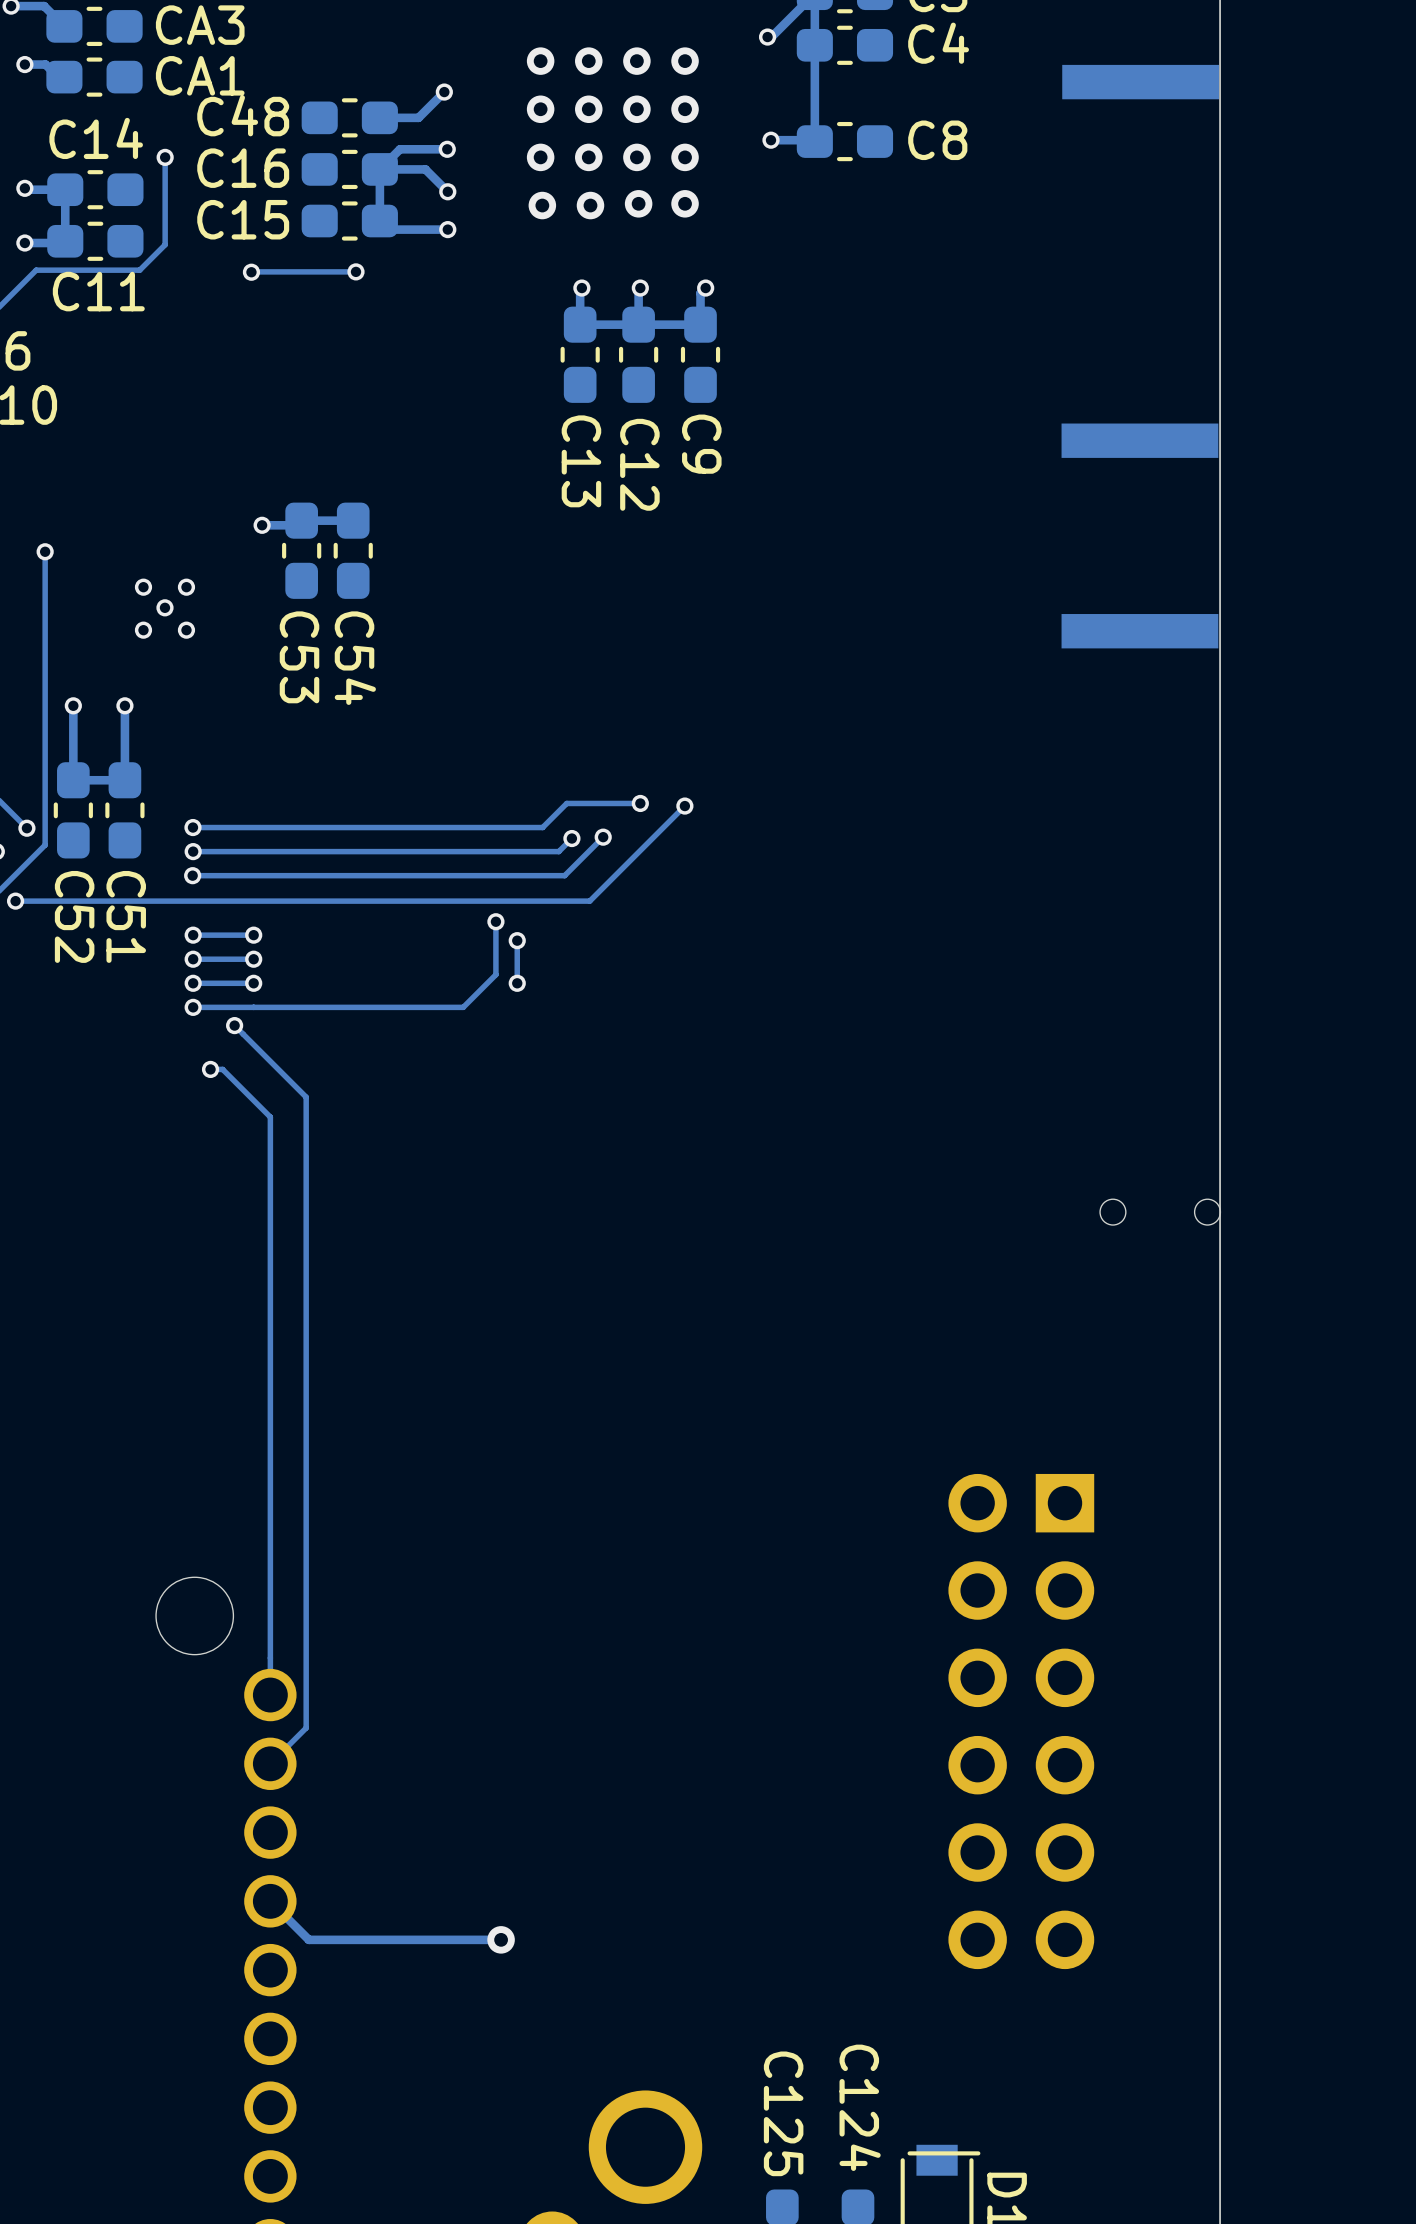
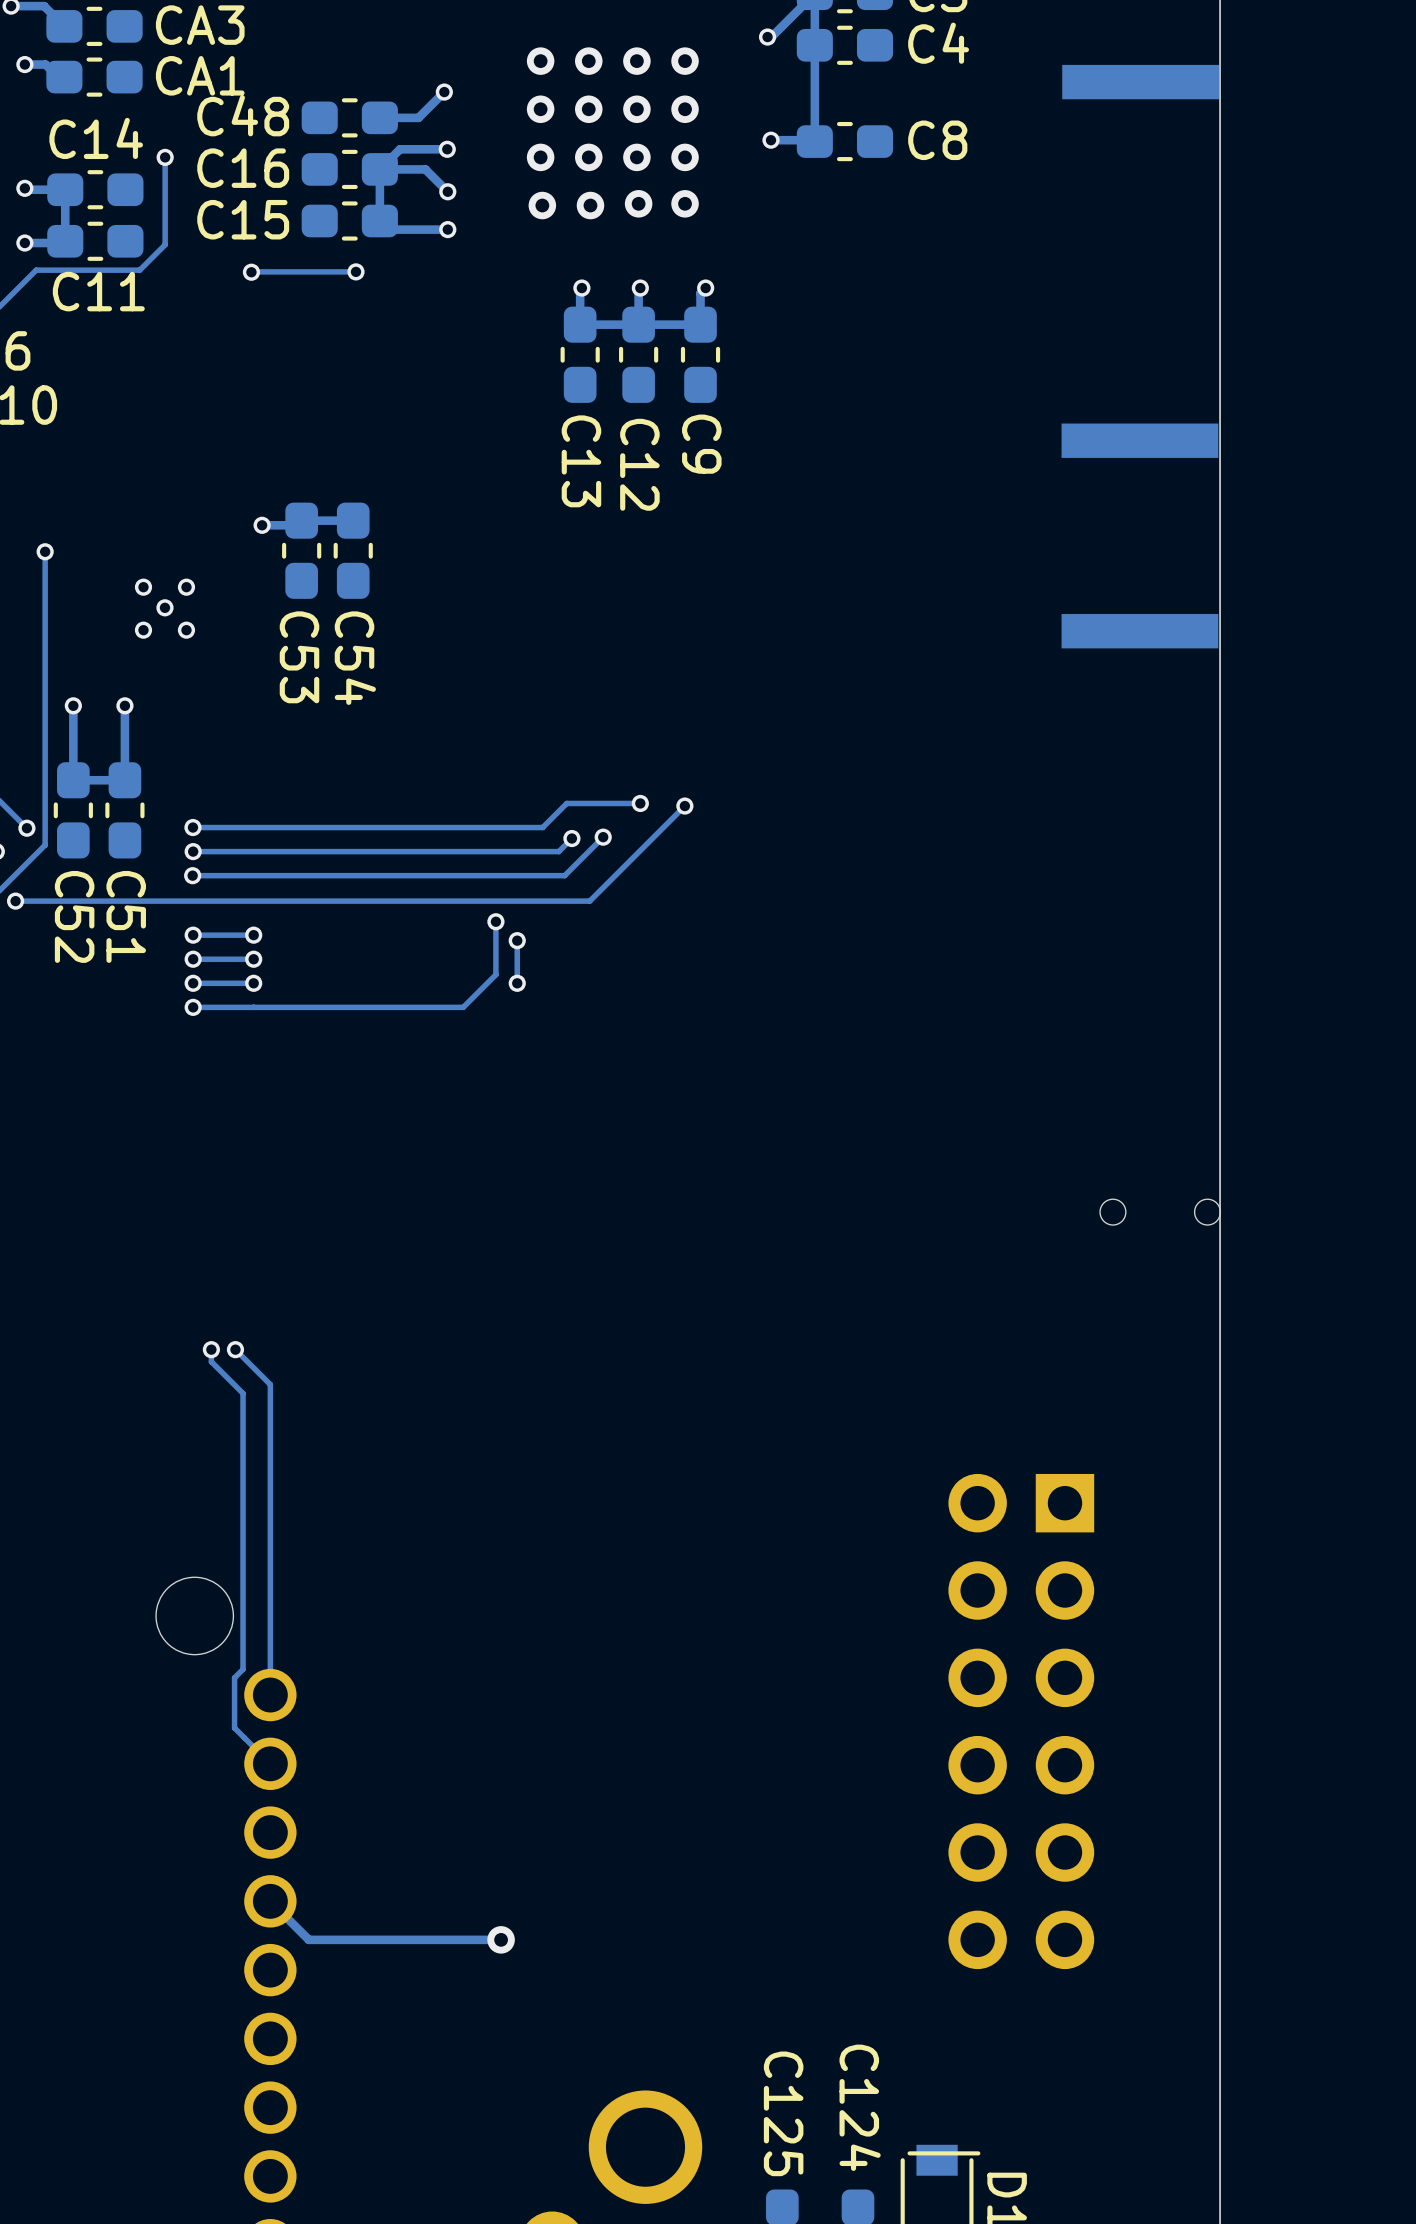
track: (234, 1025) (306, 1097) (306, 1728) (270, 1763) -> (211, 1349) (211, 1361) (243, 1393) (243, 1669) (234, 1677) (234, 1728) (270, 1763)
via: (234, 1025) -> none
track: (210, 1069) (222, 1069) (270, 1117) (270, 1384) -> (235, 1349) (270, 1384)
via: (210, 1069) -> none
via: none -> (211, 1349)
via: none -> (235, 1349)

